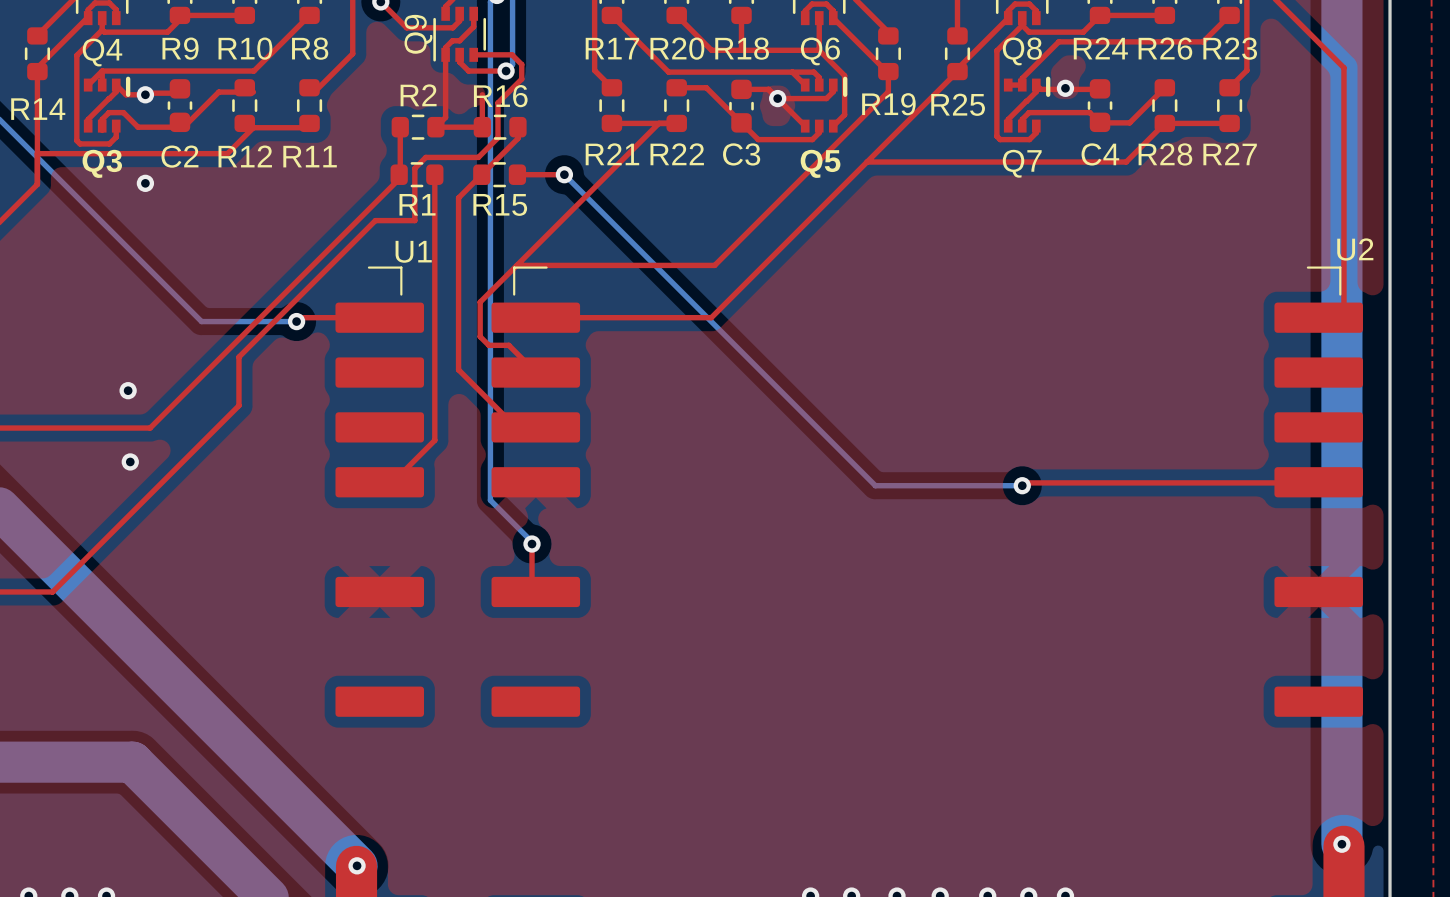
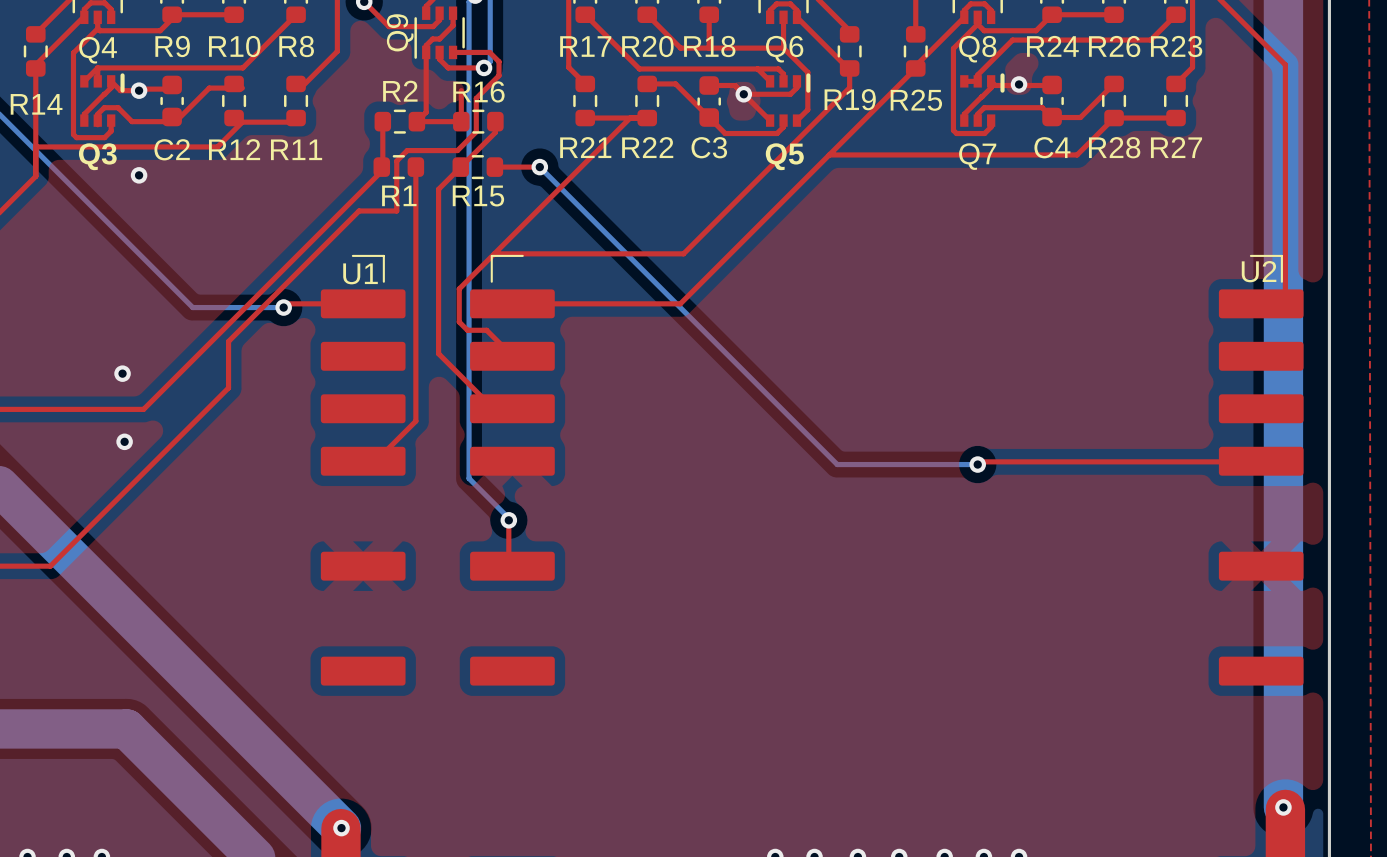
U2 name position: U2 (1355, 249) -> U2 (1259, 271)
U1 name position: U1 (413, 251) -> U1 (360, 273)

